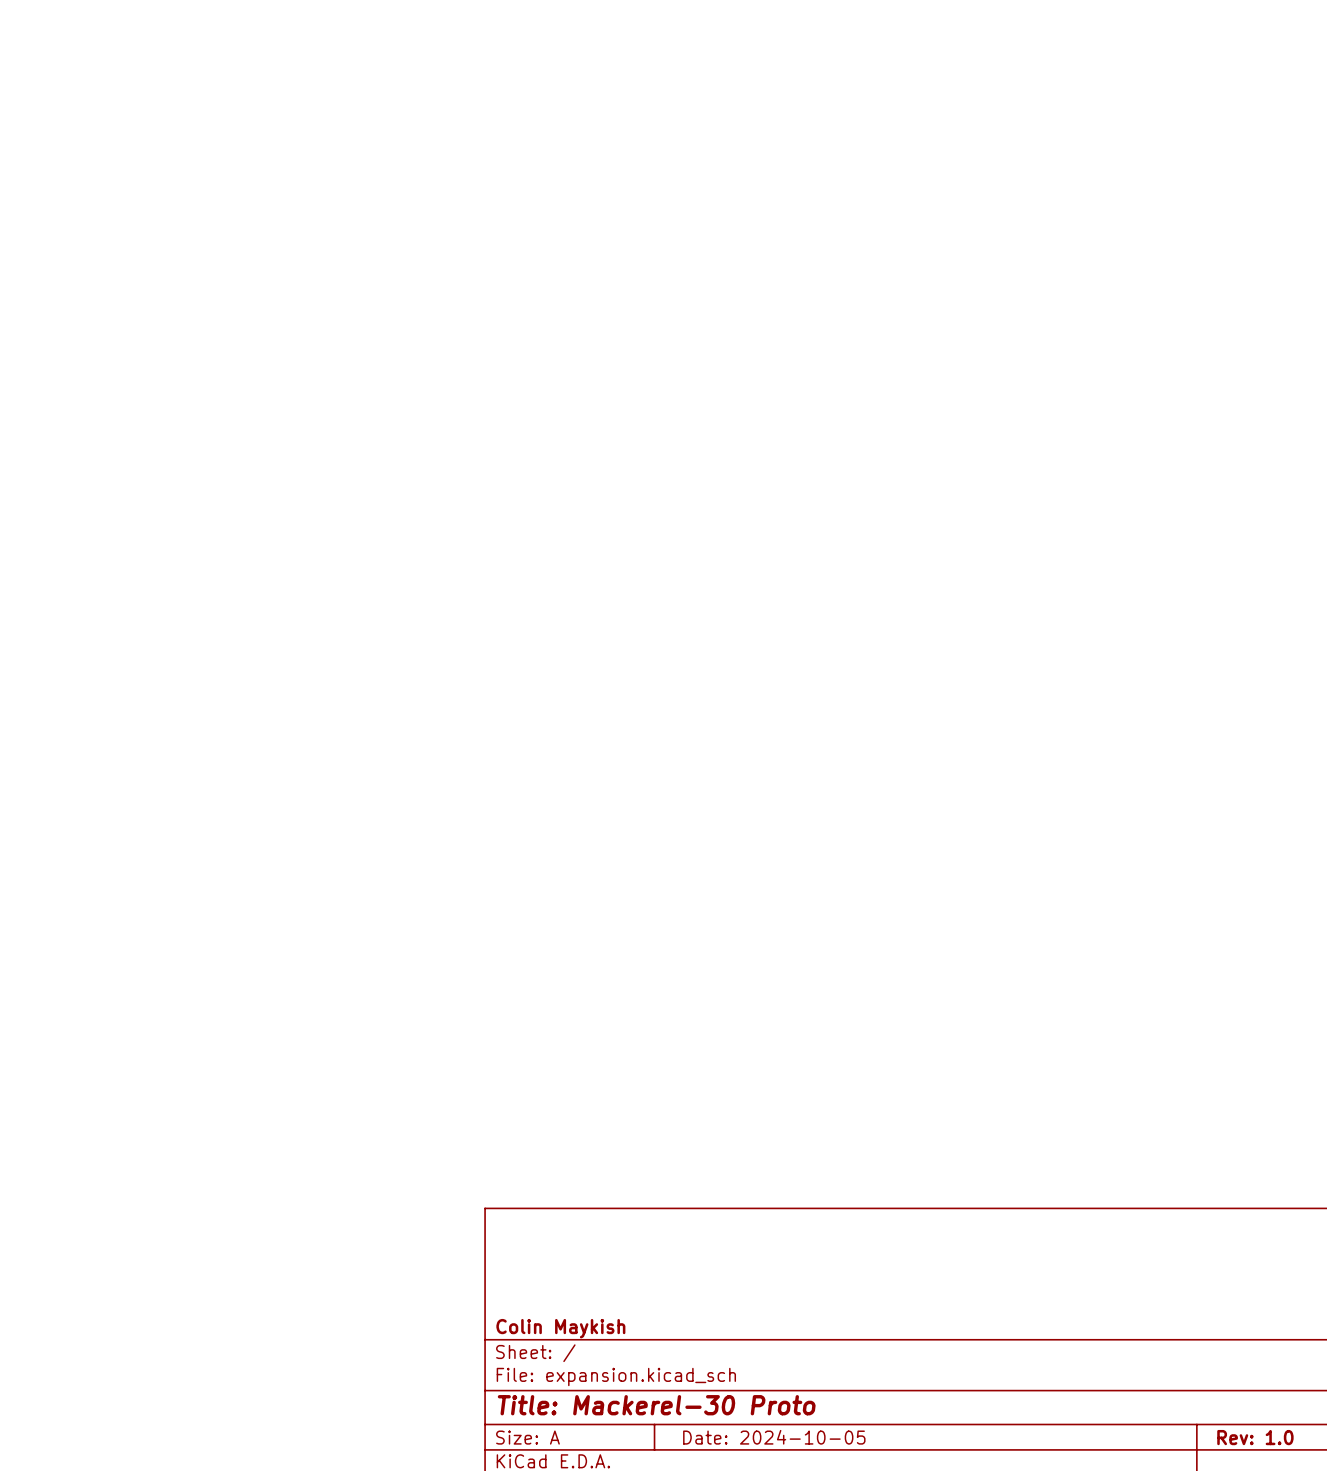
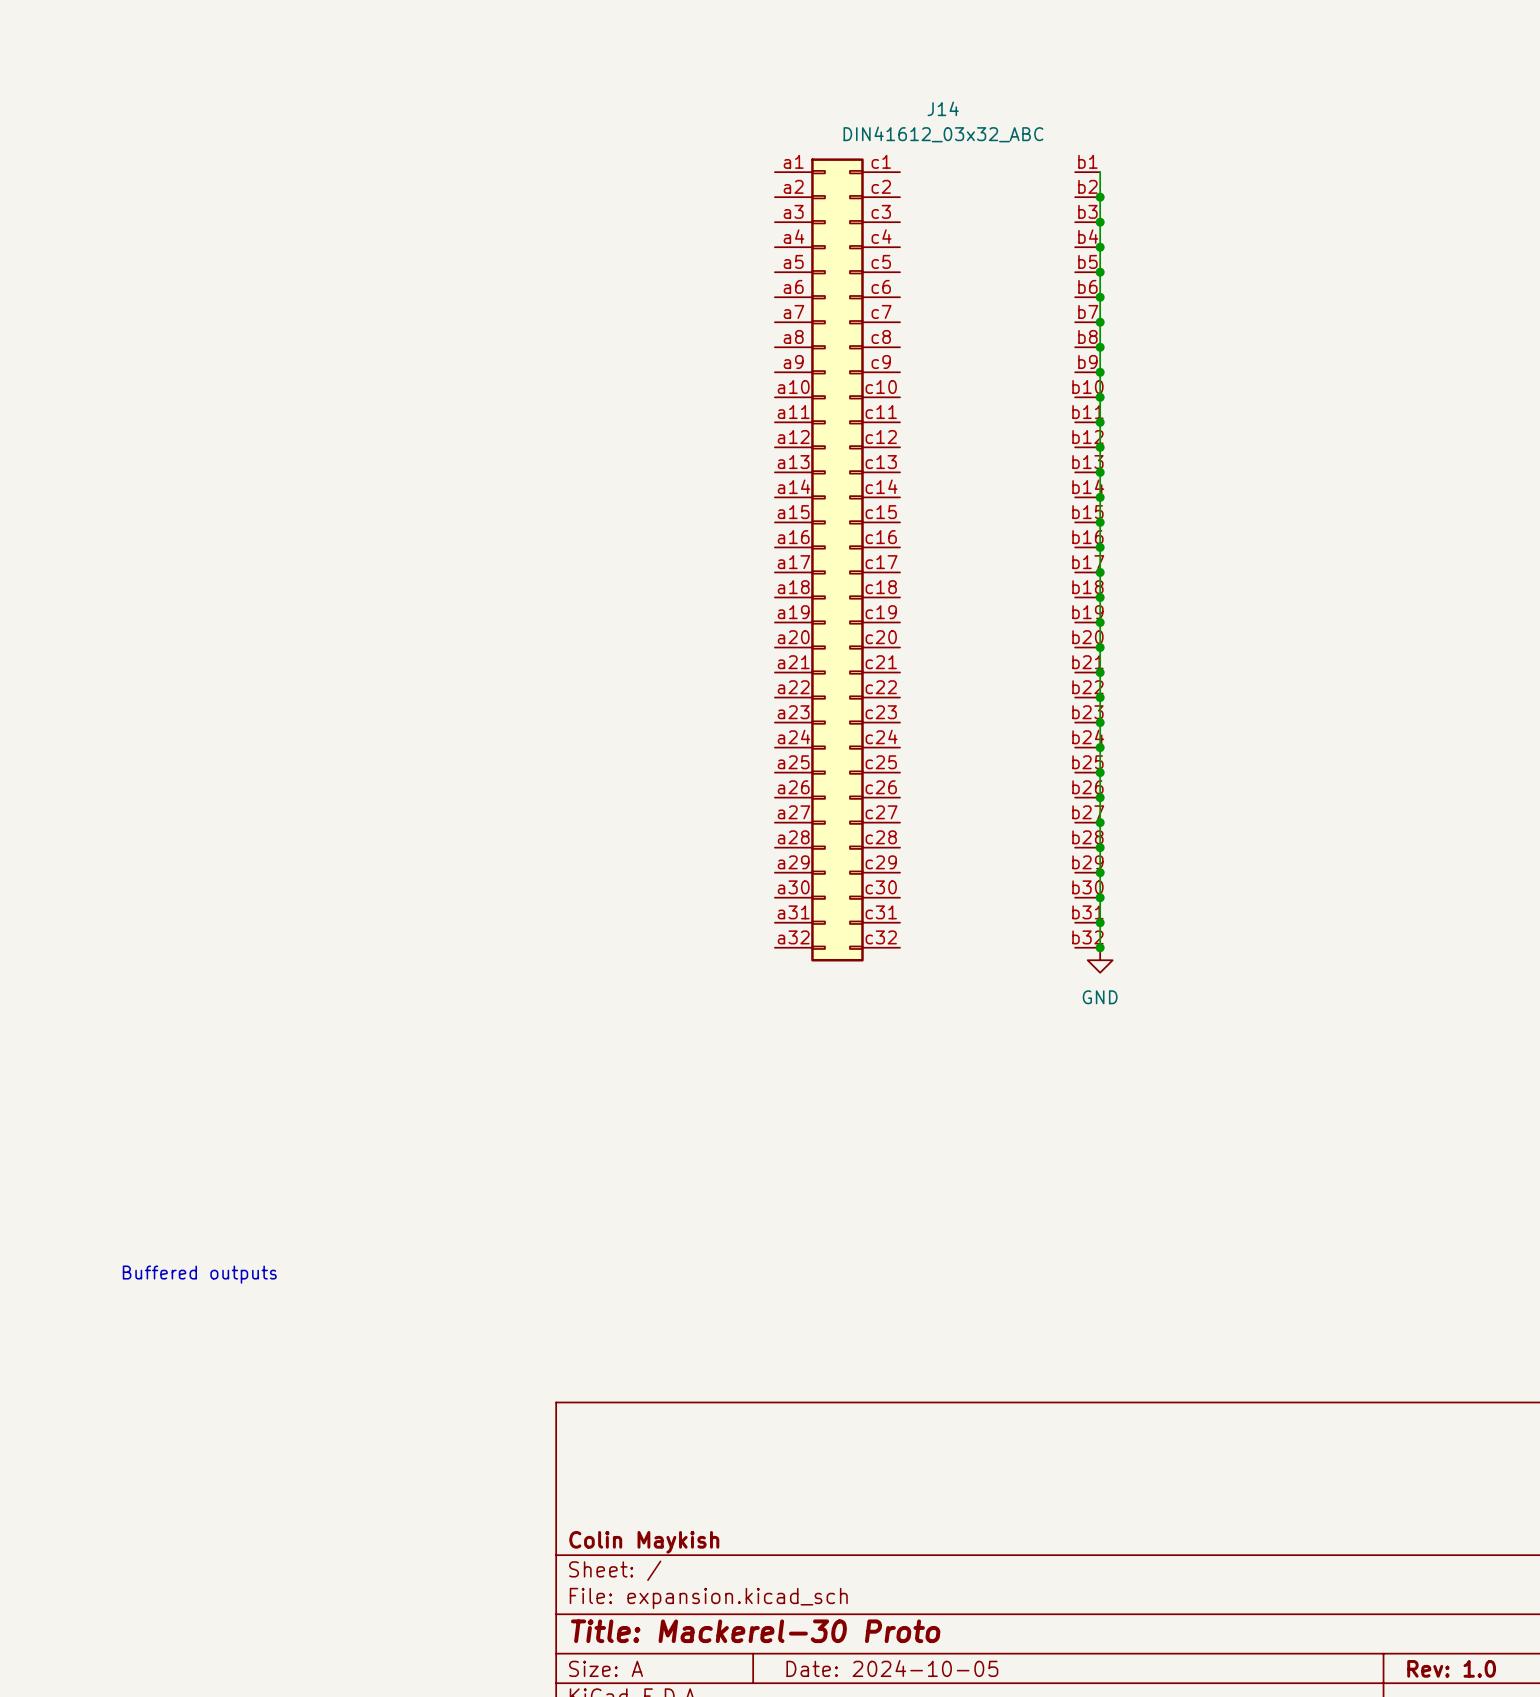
wire: none -> (1100, 172) (1100, 947)
junction: none -> (1100, 197)
junction: none -> (1100, 222)
junction: none -> (1100, 247)
junction: none -> (1100, 272)
junction: none -> (1100, 297)
junction: none -> (1100, 322)
junction: none -> (1100, 347)
junction: none -> (1100, 372)
junction: none -> (1100, 397)
junction: none -> (1100, 422)
junction: none -> (1100, 447)
junction: none -> (1100, 472)
junction: none -> (1100, 497)
junction: none -> (1100, 522)
junction: none -> (1100, 547)
J14: none -> DIN41612_03x32_ABC (937, 559)
junction: none -> (1100, 572)
junction: none -> (1100, 597)
junction: none -> (1100, 622)
junction: none -> (1100, 647)
junction: none -> (1100, 672)
junction: none -> (1100, 697)
junction: none -> (1100, 722)
junction: none -> (1100, 747)
junction: none -> (1100, 772)
junction: none -> (1100, 797)
junction: none -> (1100, 822)
junction: none -> (1100, 847)
junction: none -> (1100, 872)
junction: none -> (1100, 897)
junction: none -> (1100, 922)
junction: none -> (1100, 947)
power symbol: none -> GND (1100, 960)
text: none -> Buffered outputs (199, 1274)

